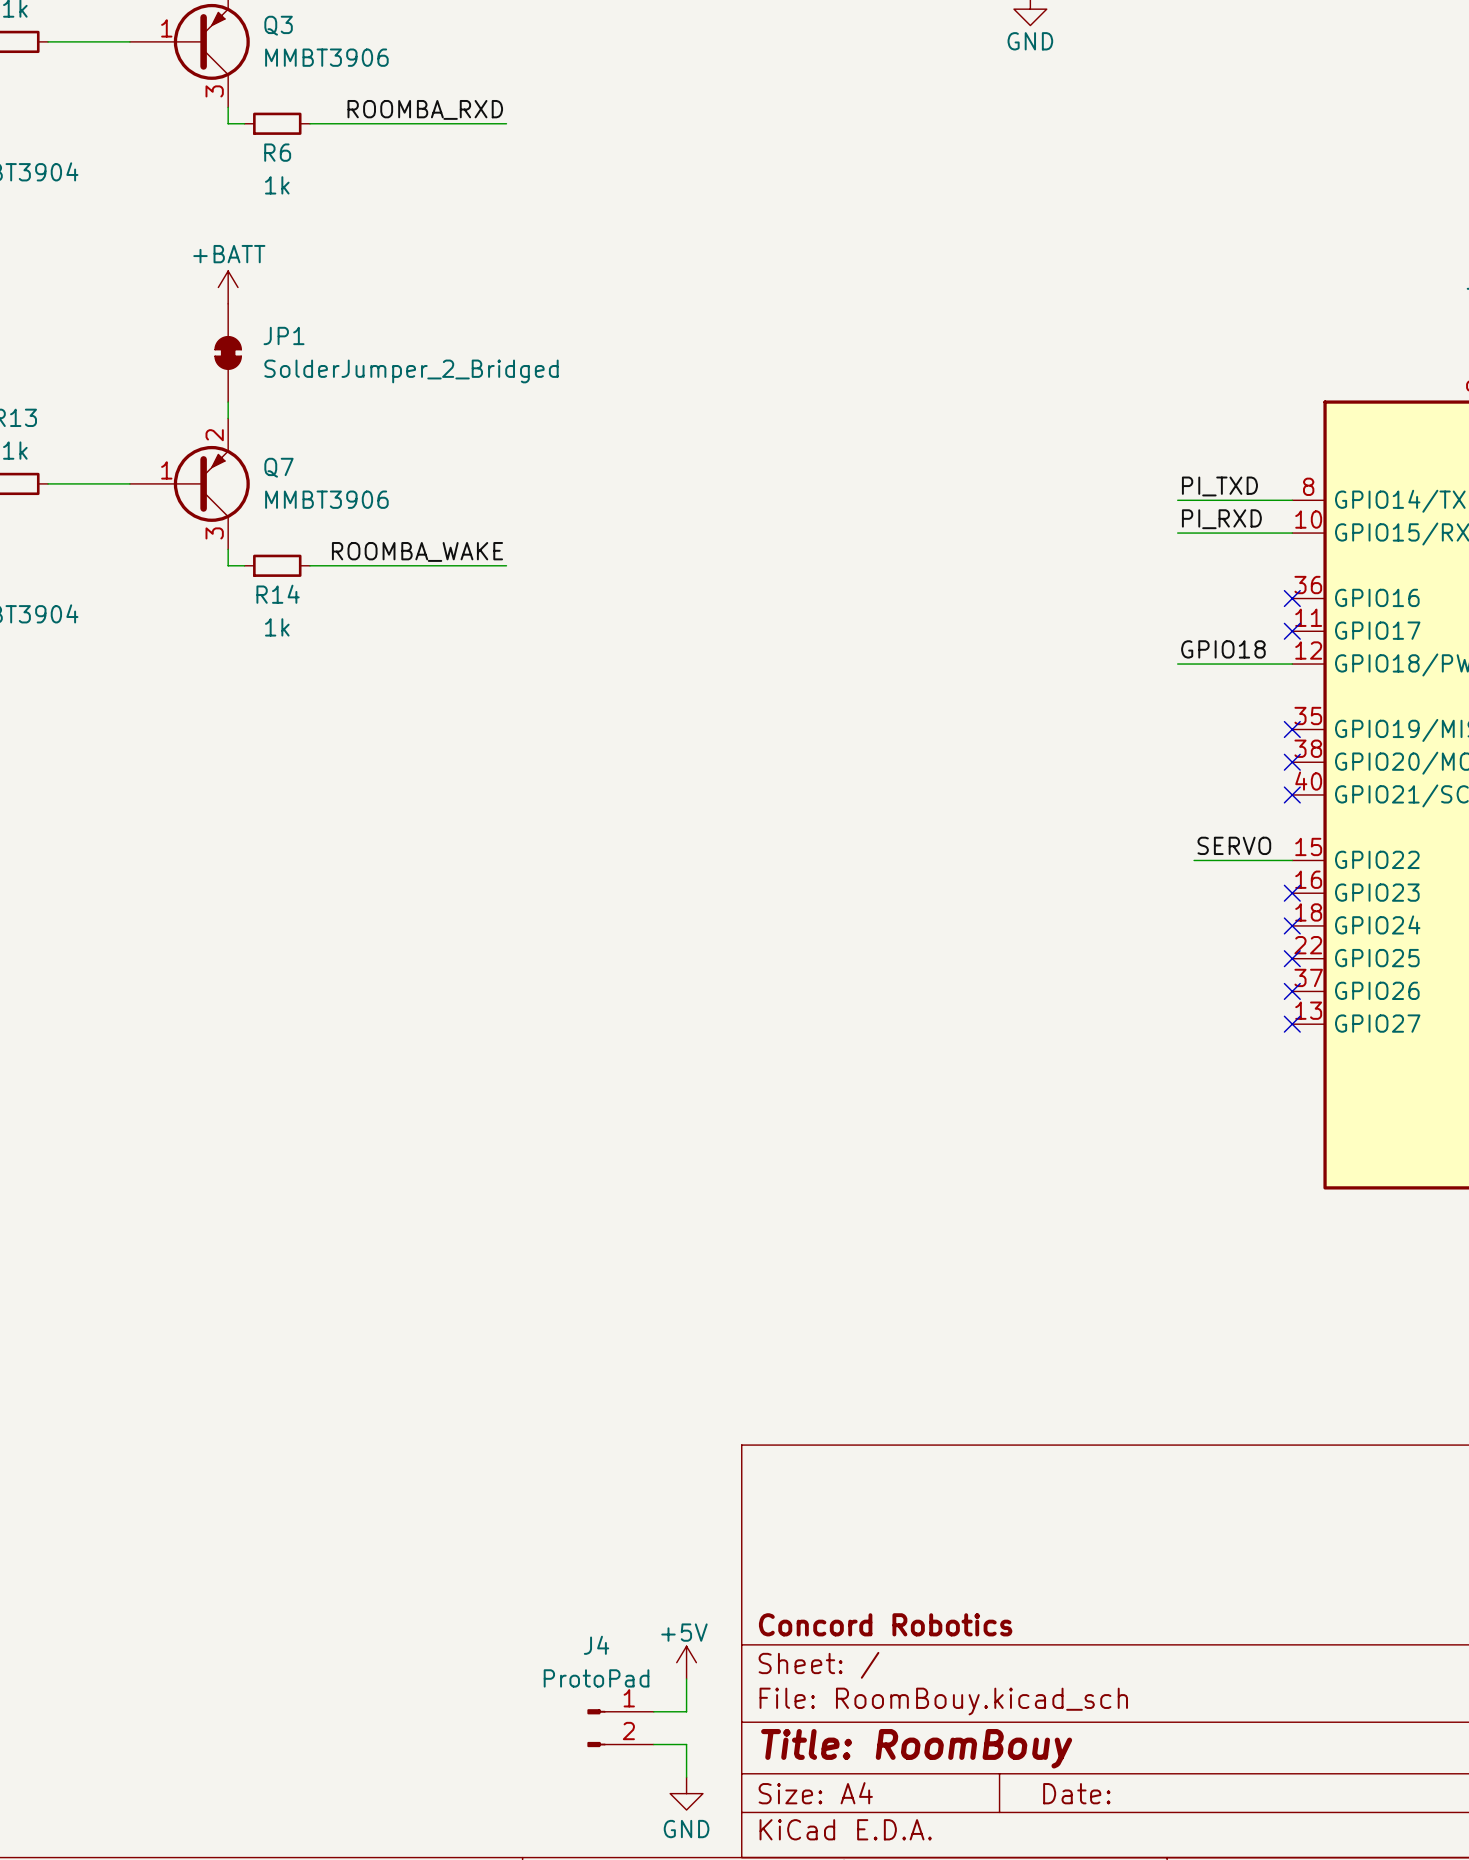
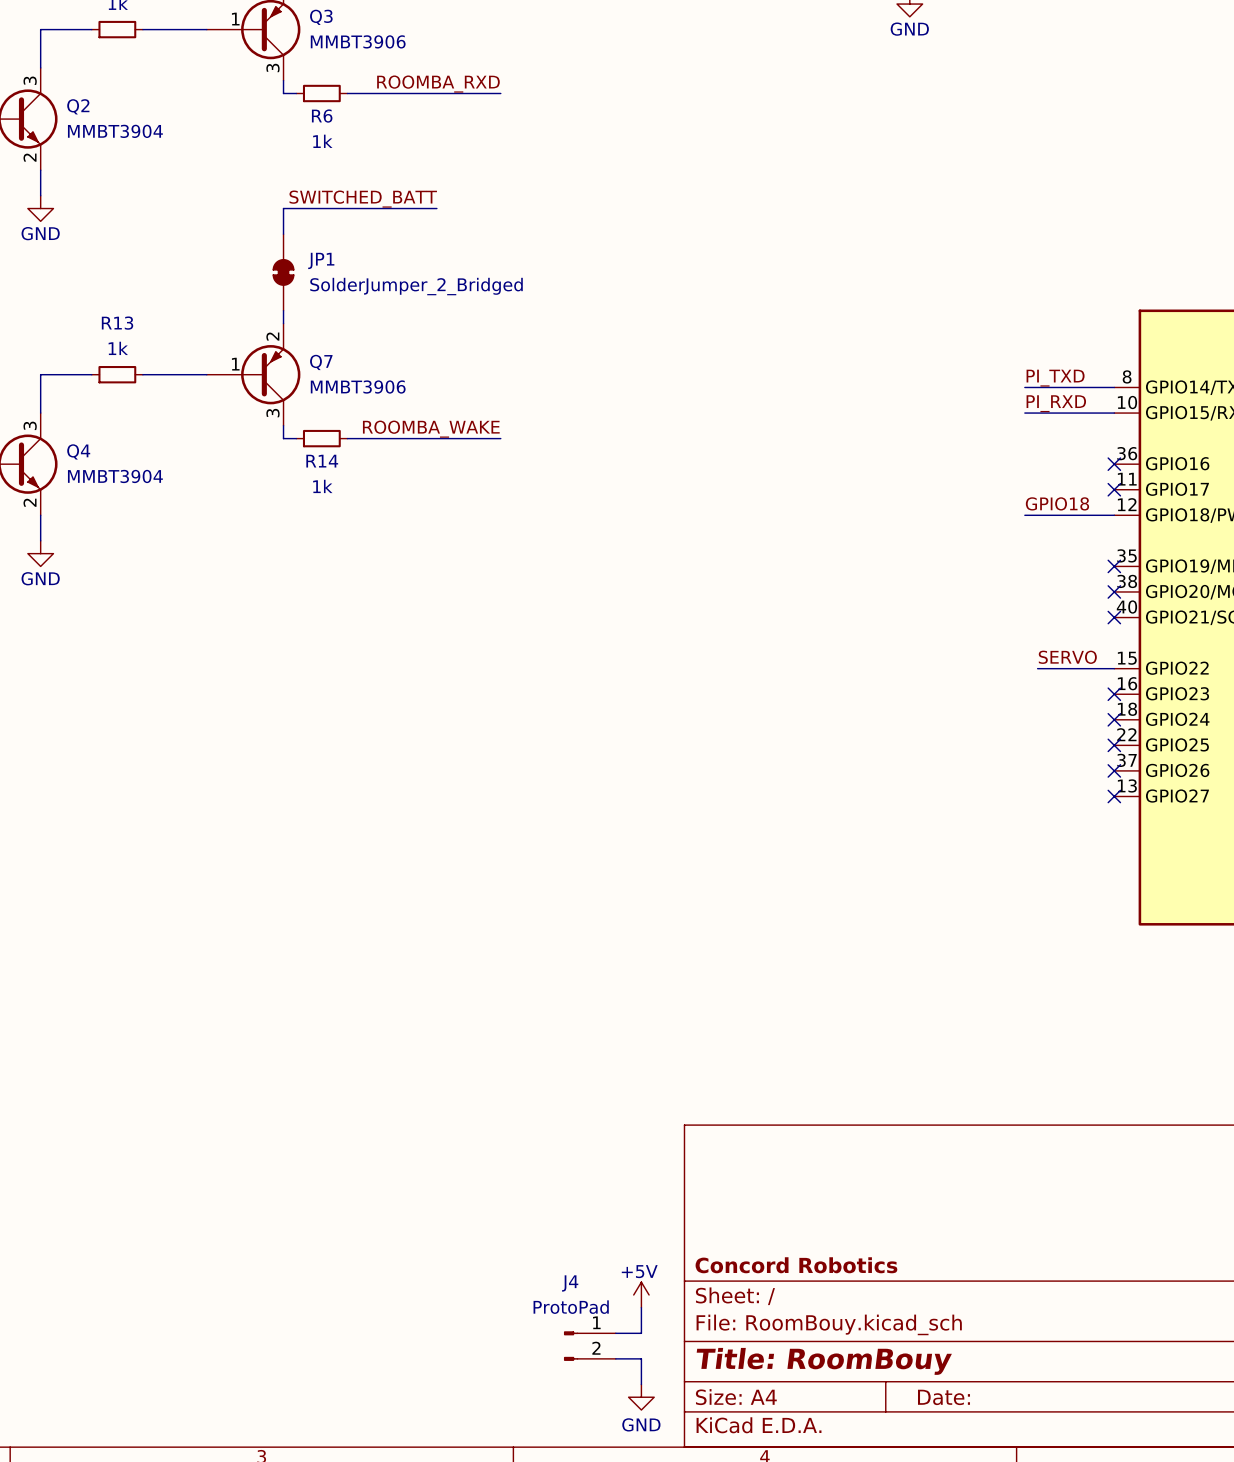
label: none -> SWITCHED_BATT (363, 199)
wire: none -> (436, 208) (283, 208) (283, 234)
power symbol: +BATT (228, 287) -> none

